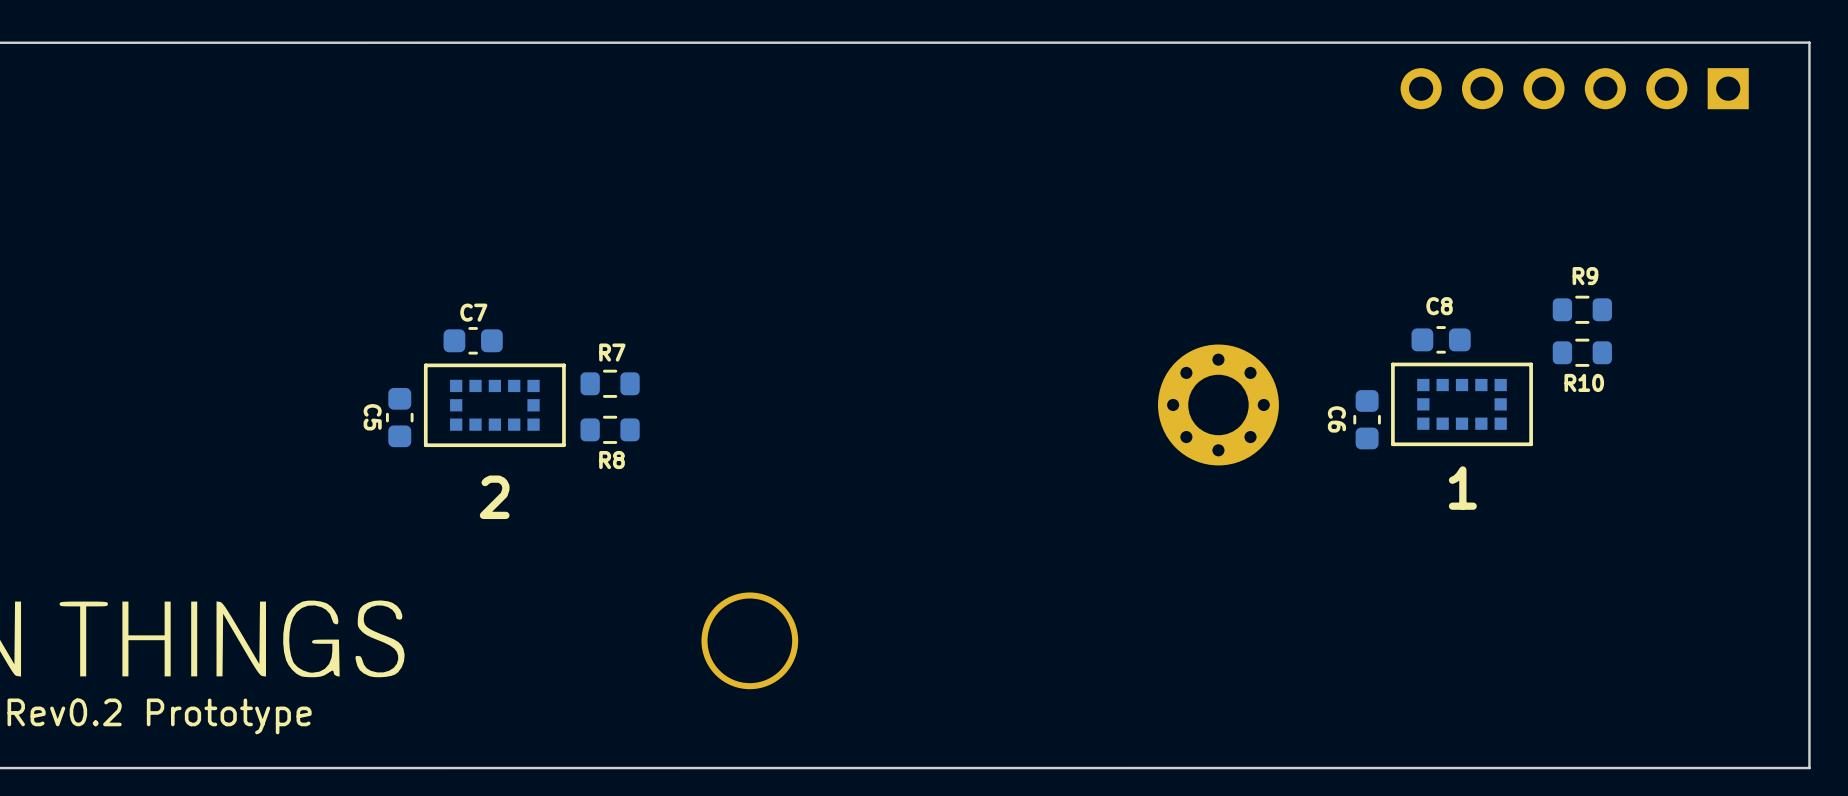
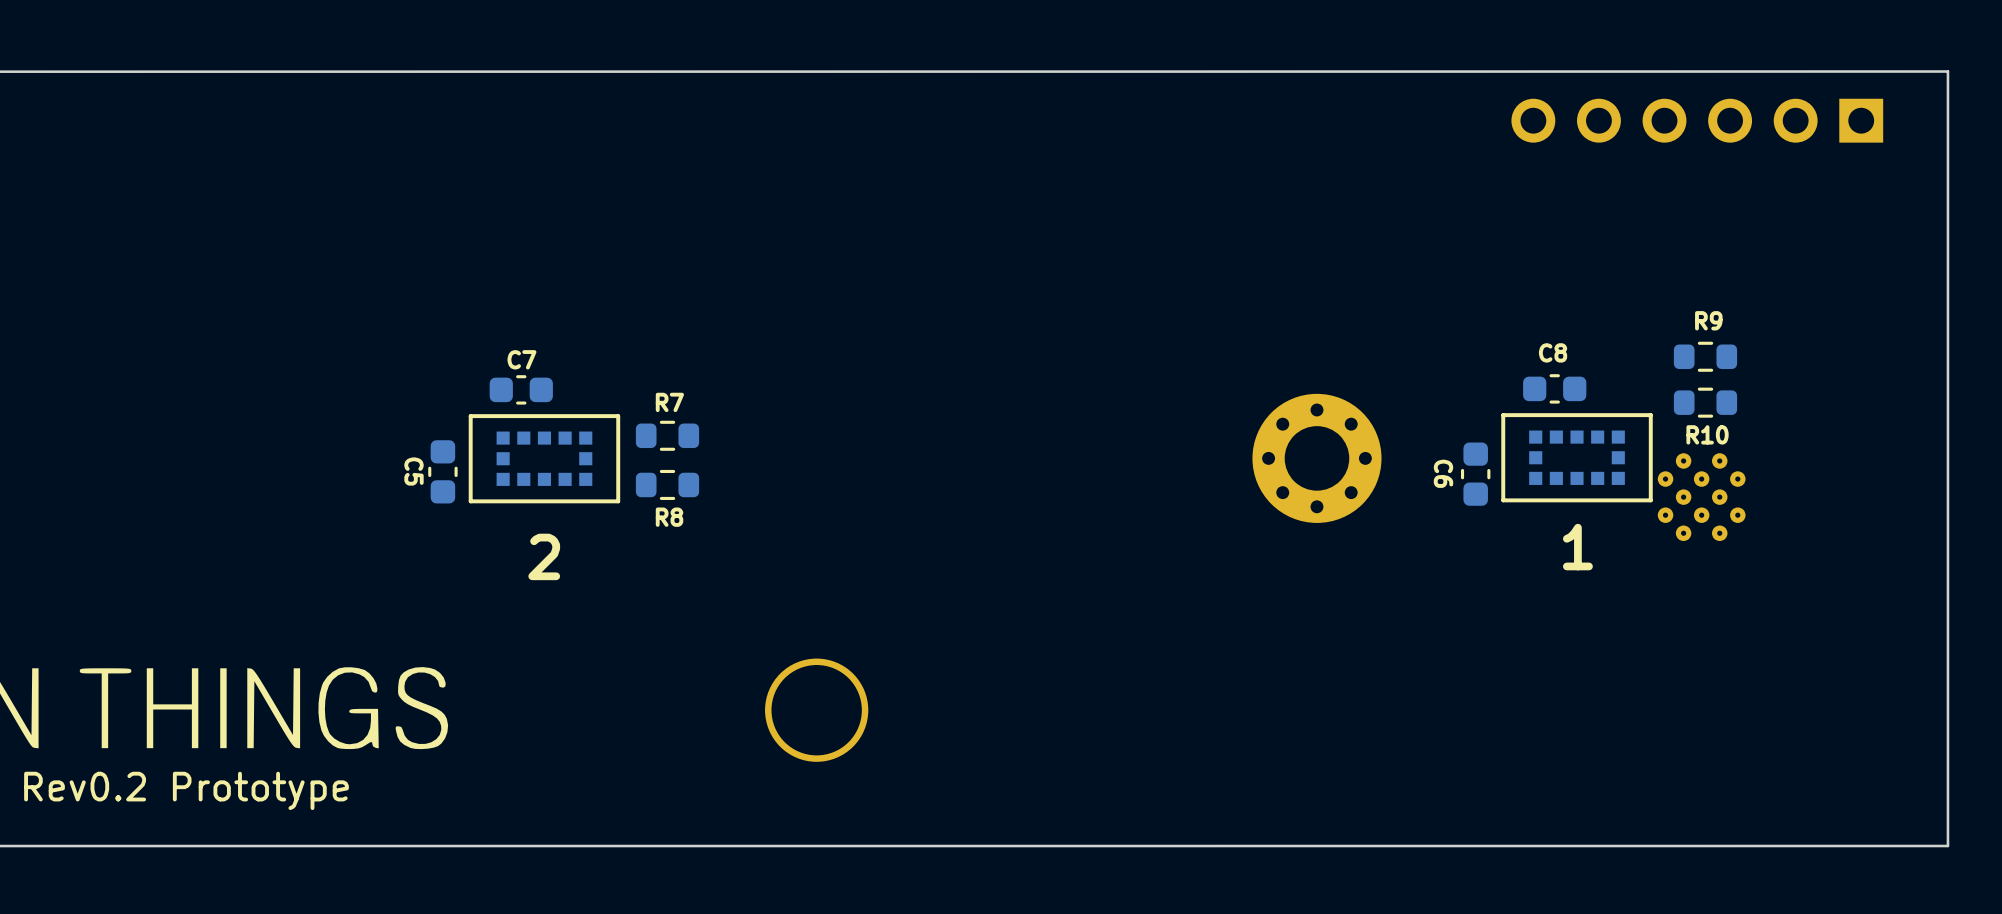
part: none -> (1701, 497)

